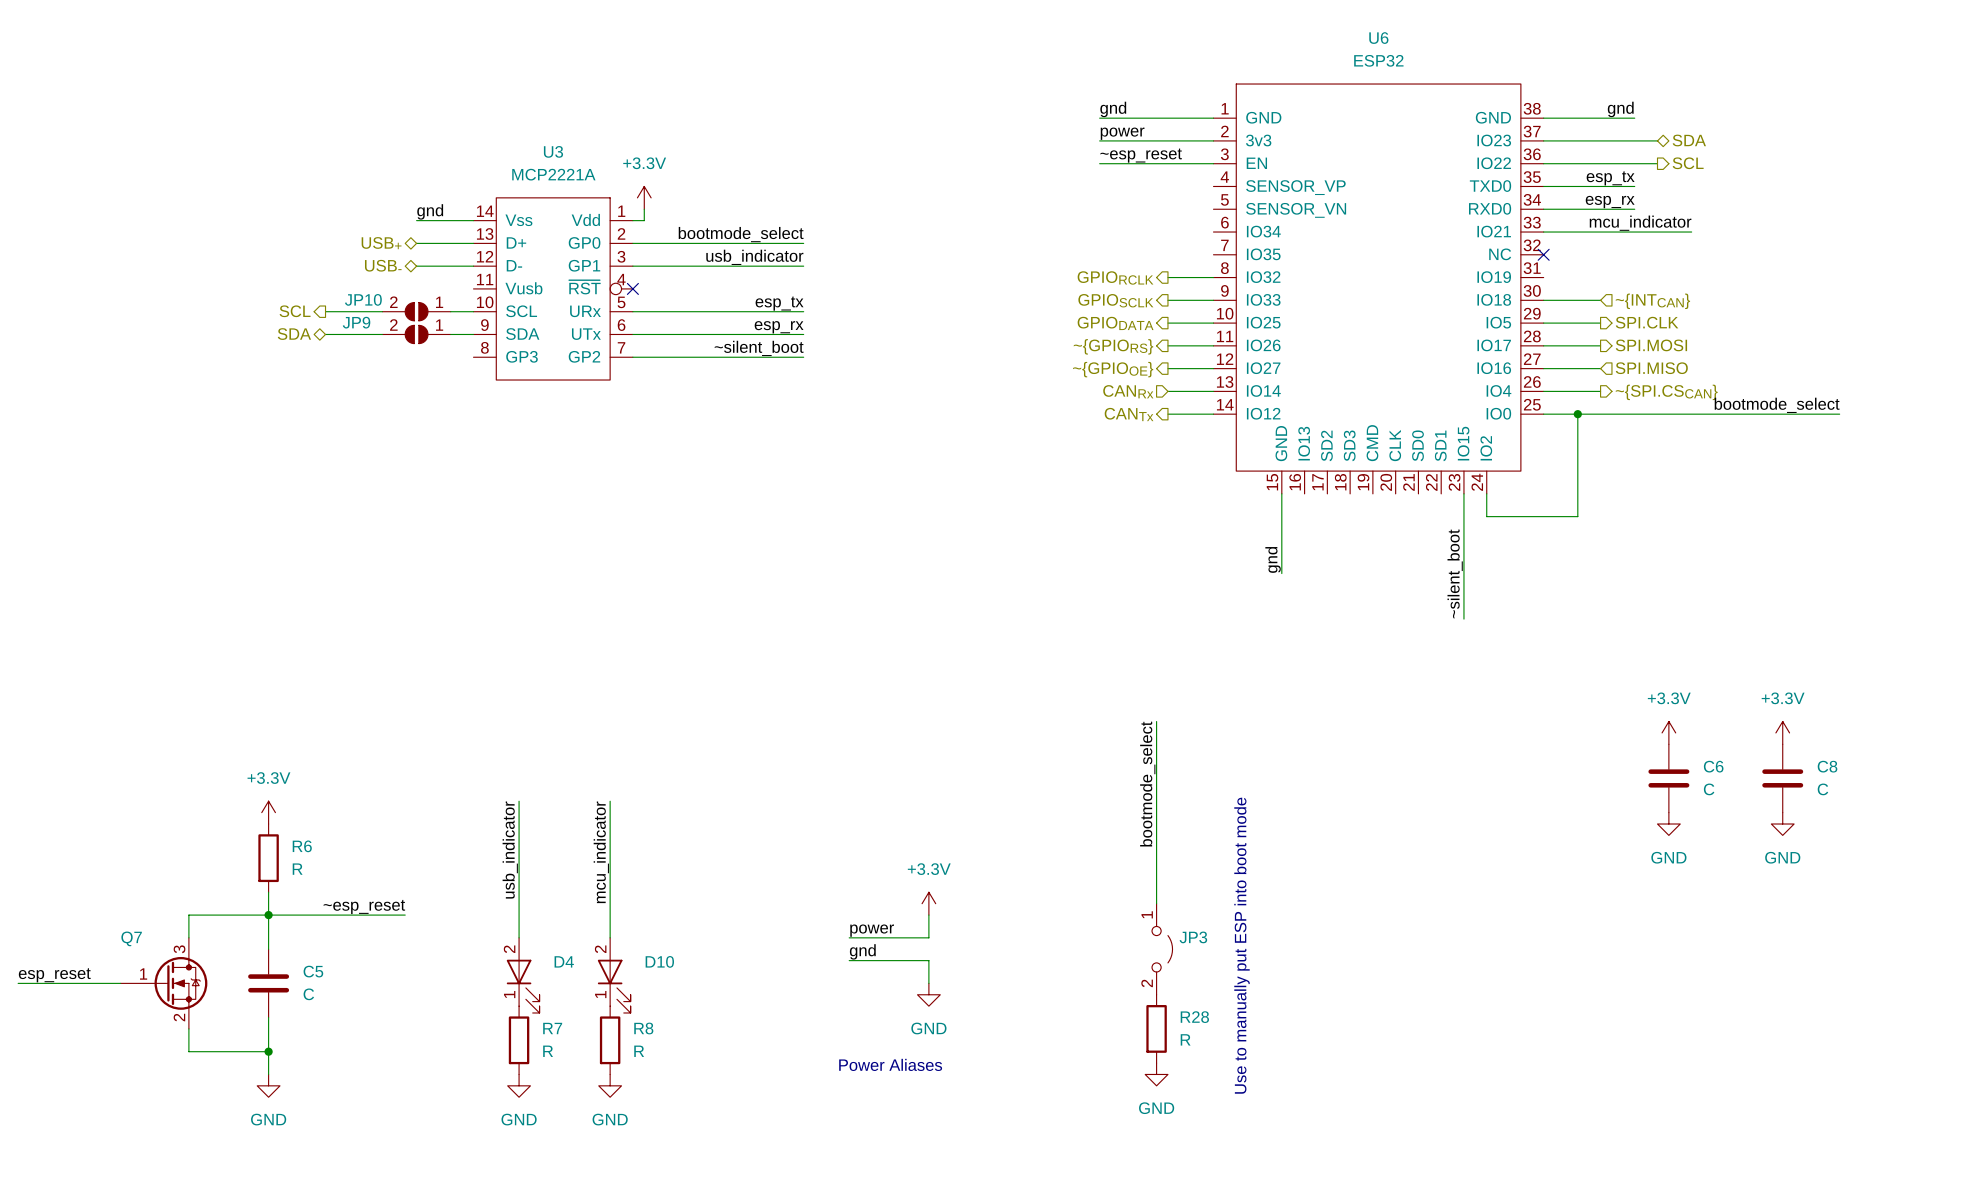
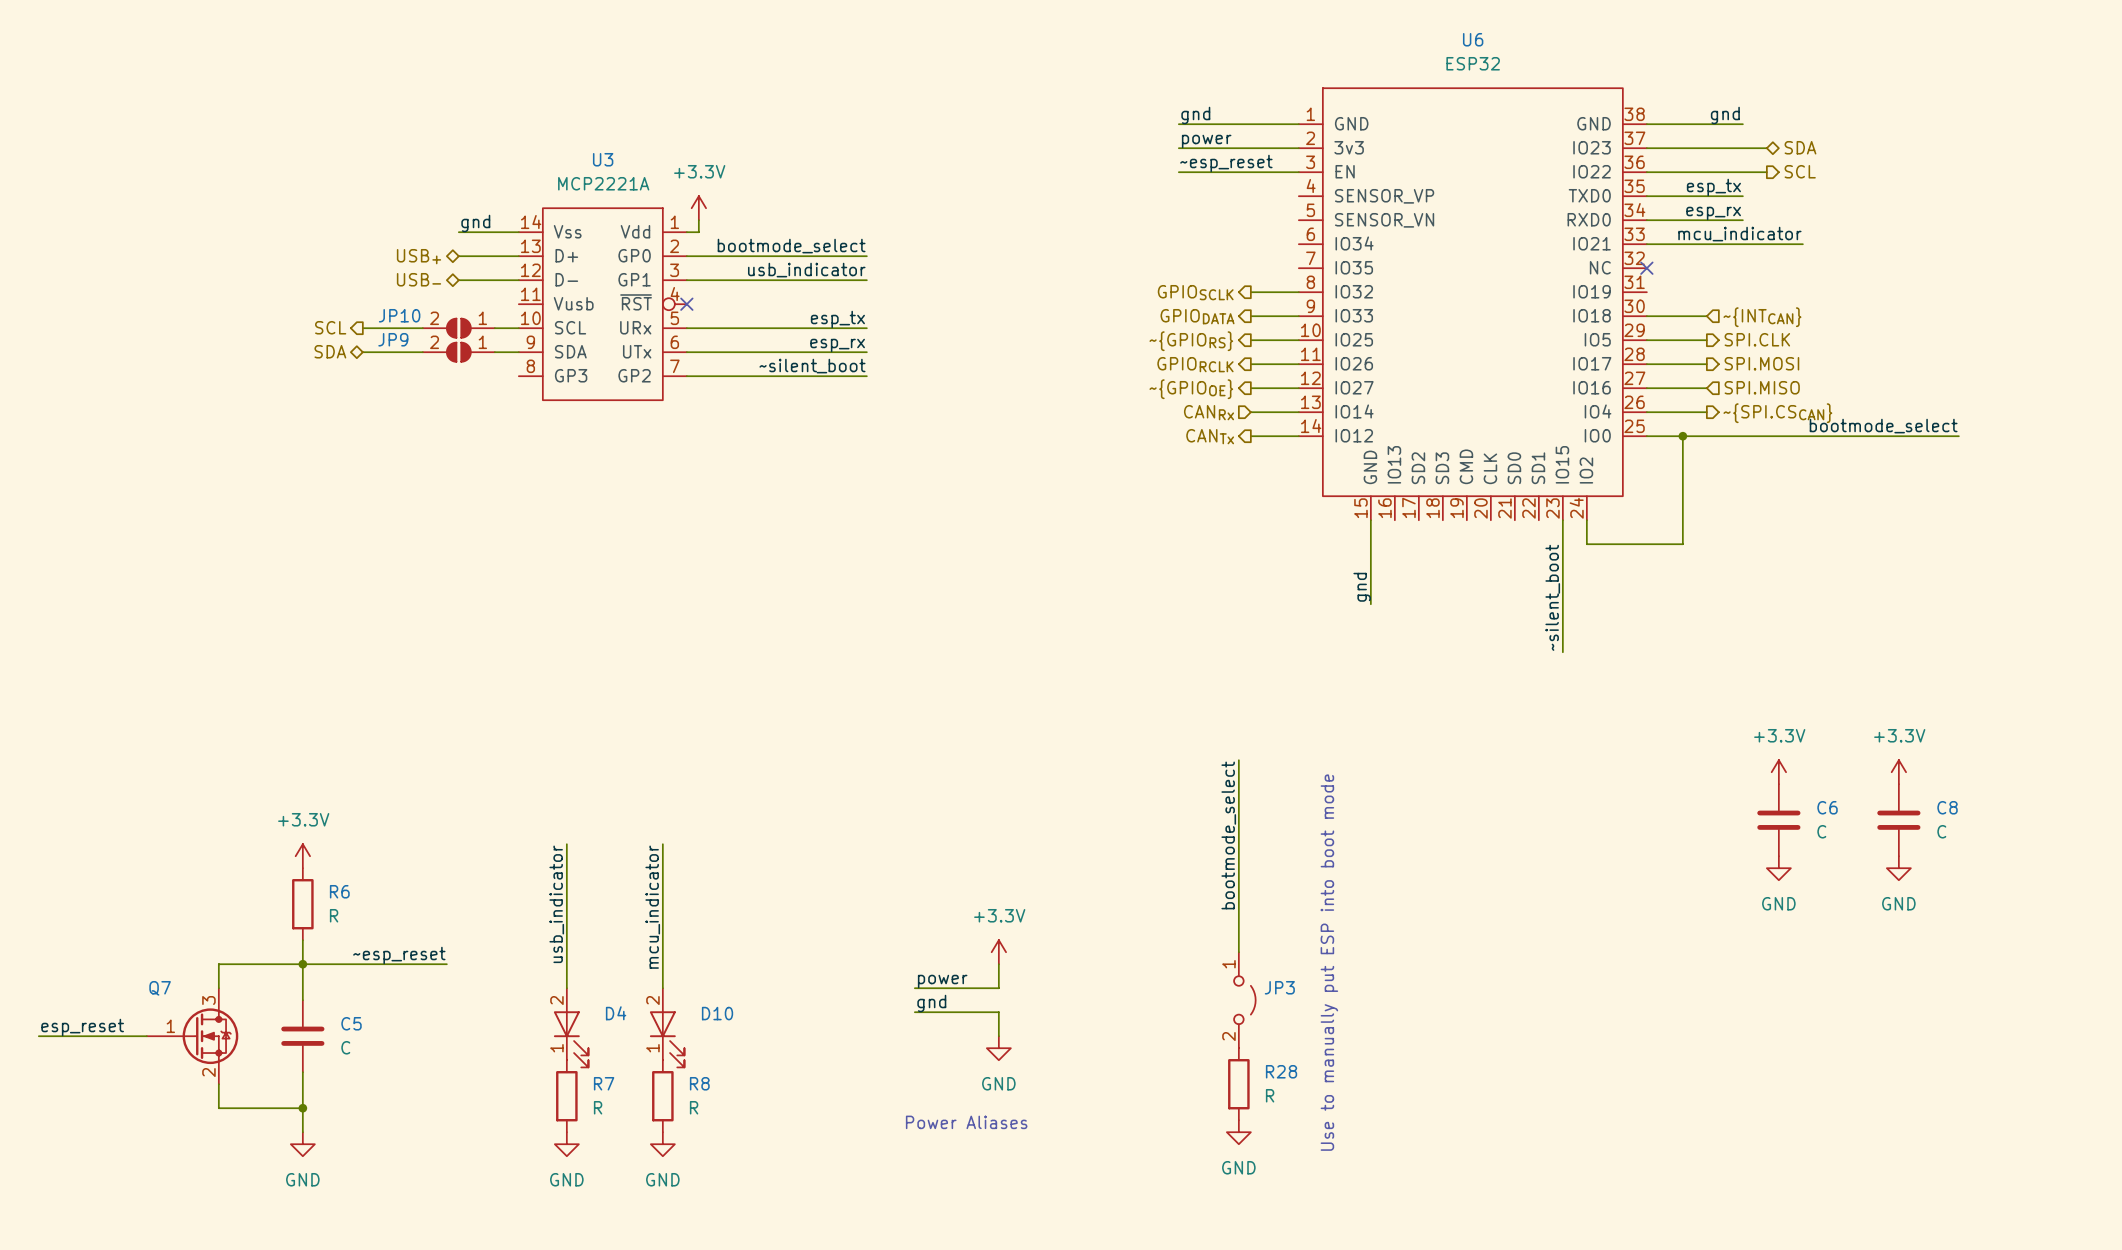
hierarchical label: GPIORCLK (1115, 277) -> GPIOSCLK (1195, 292)
hierarchical label: GPIOSCLK (1115, 300) -> GPIODATA (1197, 316)
hierarchical label: GPIODATA (1115, 323) -> ~{GPIORS} (1191, 341)
hierarchical label: ~{GPIORS} (1113, 346) -> GPIORCLK (1195, 364)

